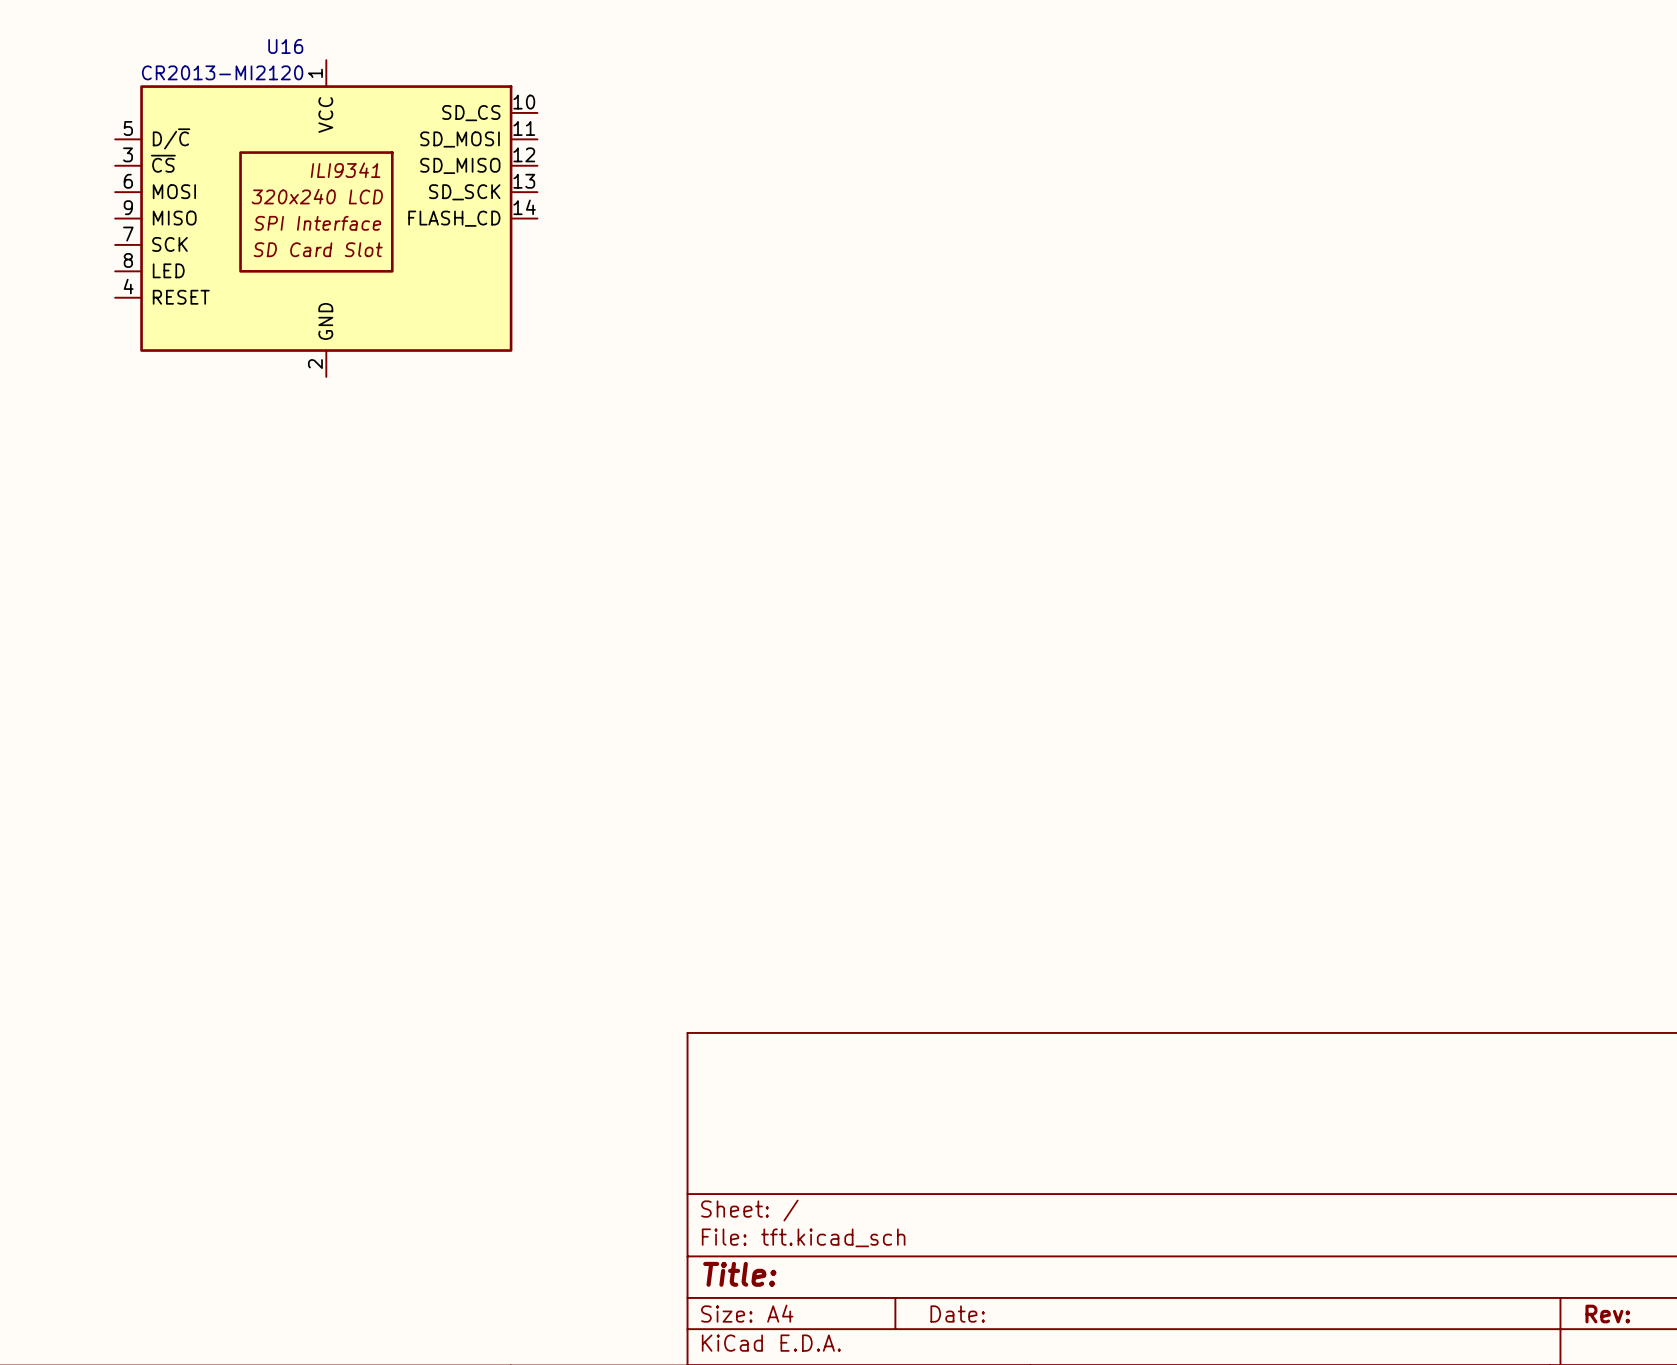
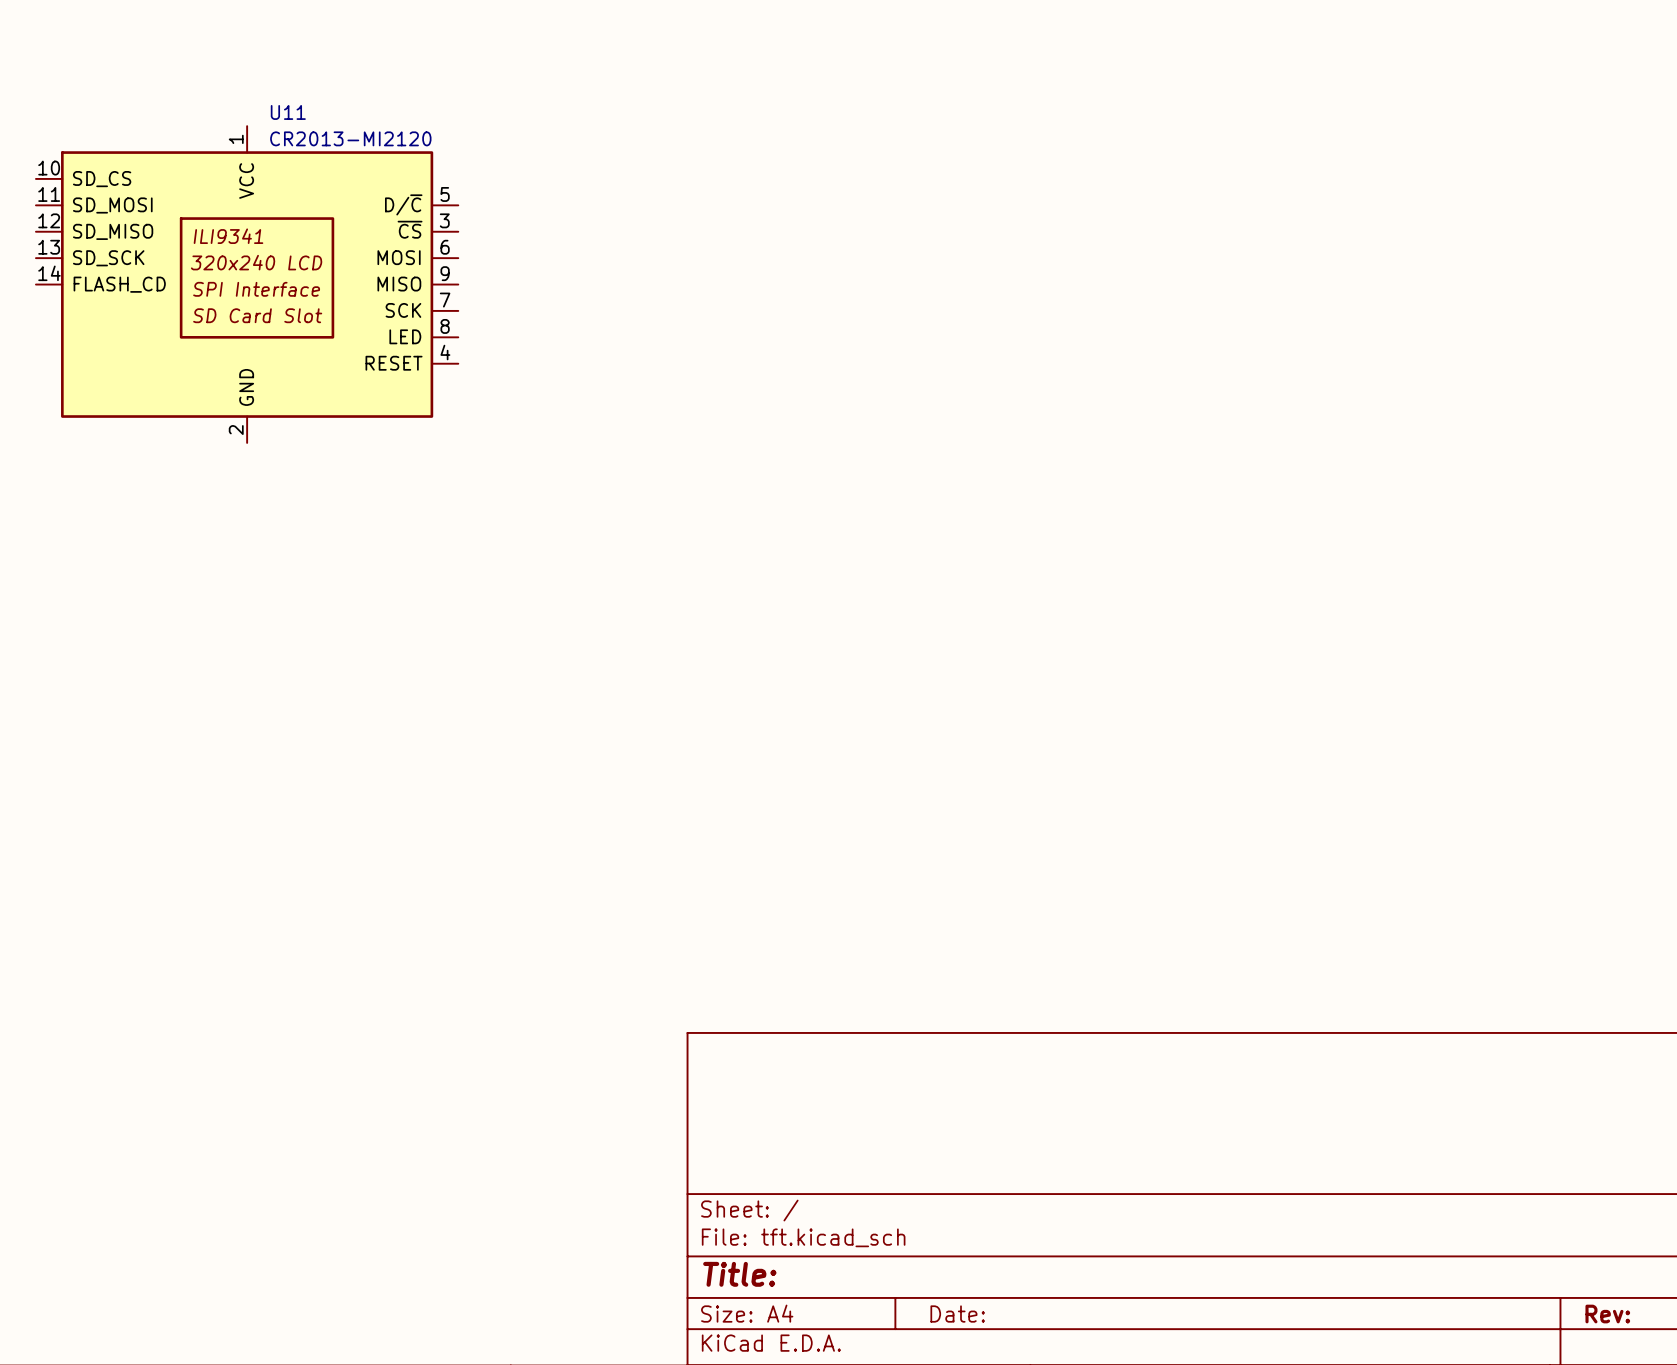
U16: CR2013-MI2120 (326, 218) -> none
U11: none -> CR2013-MI2120 (247, 284)

